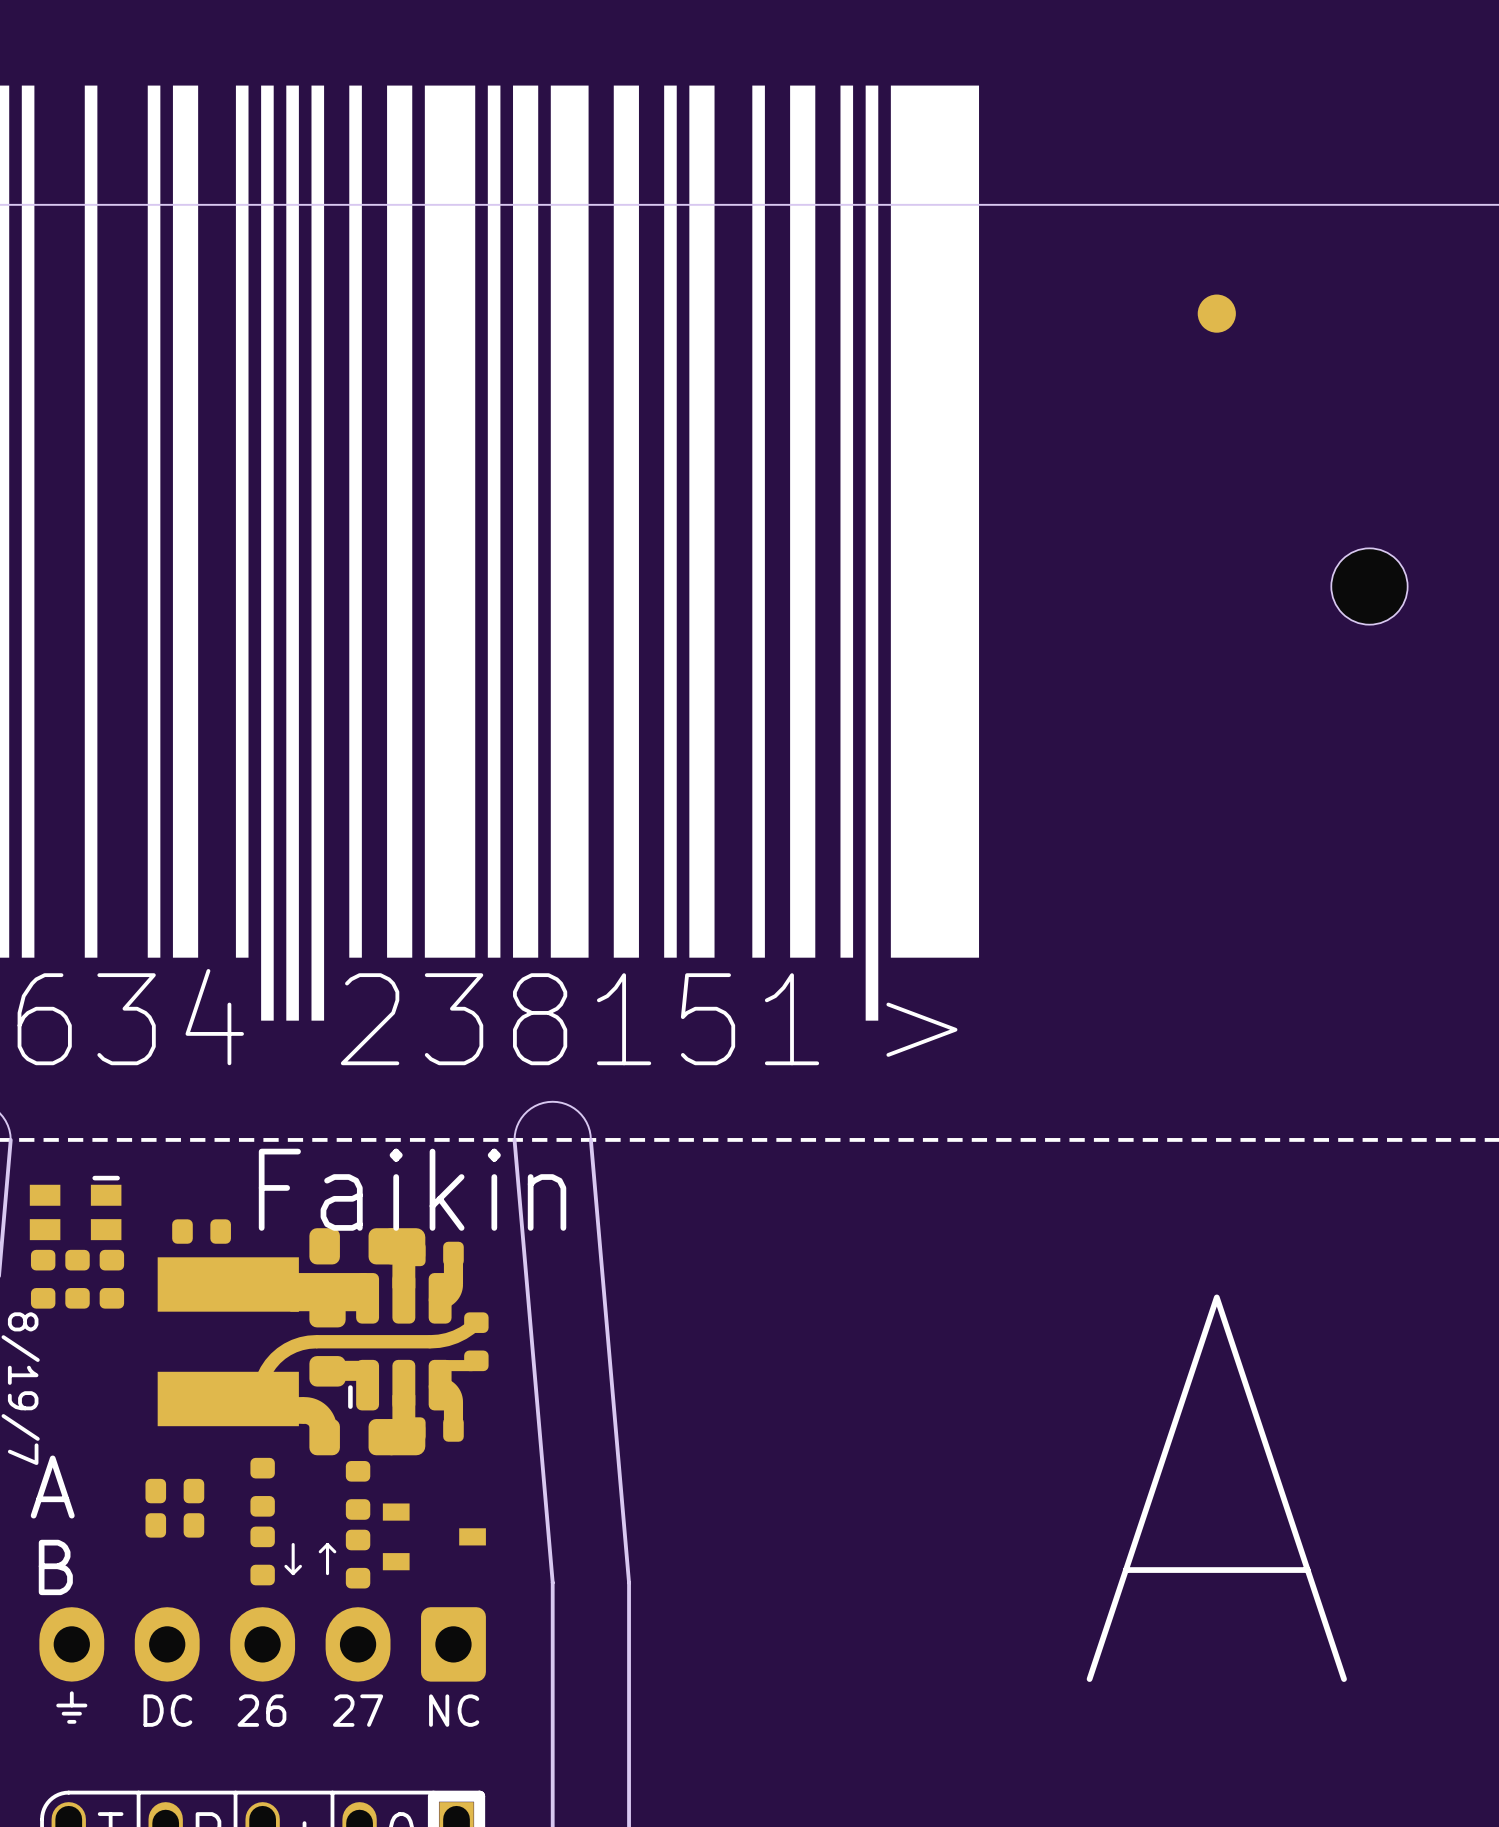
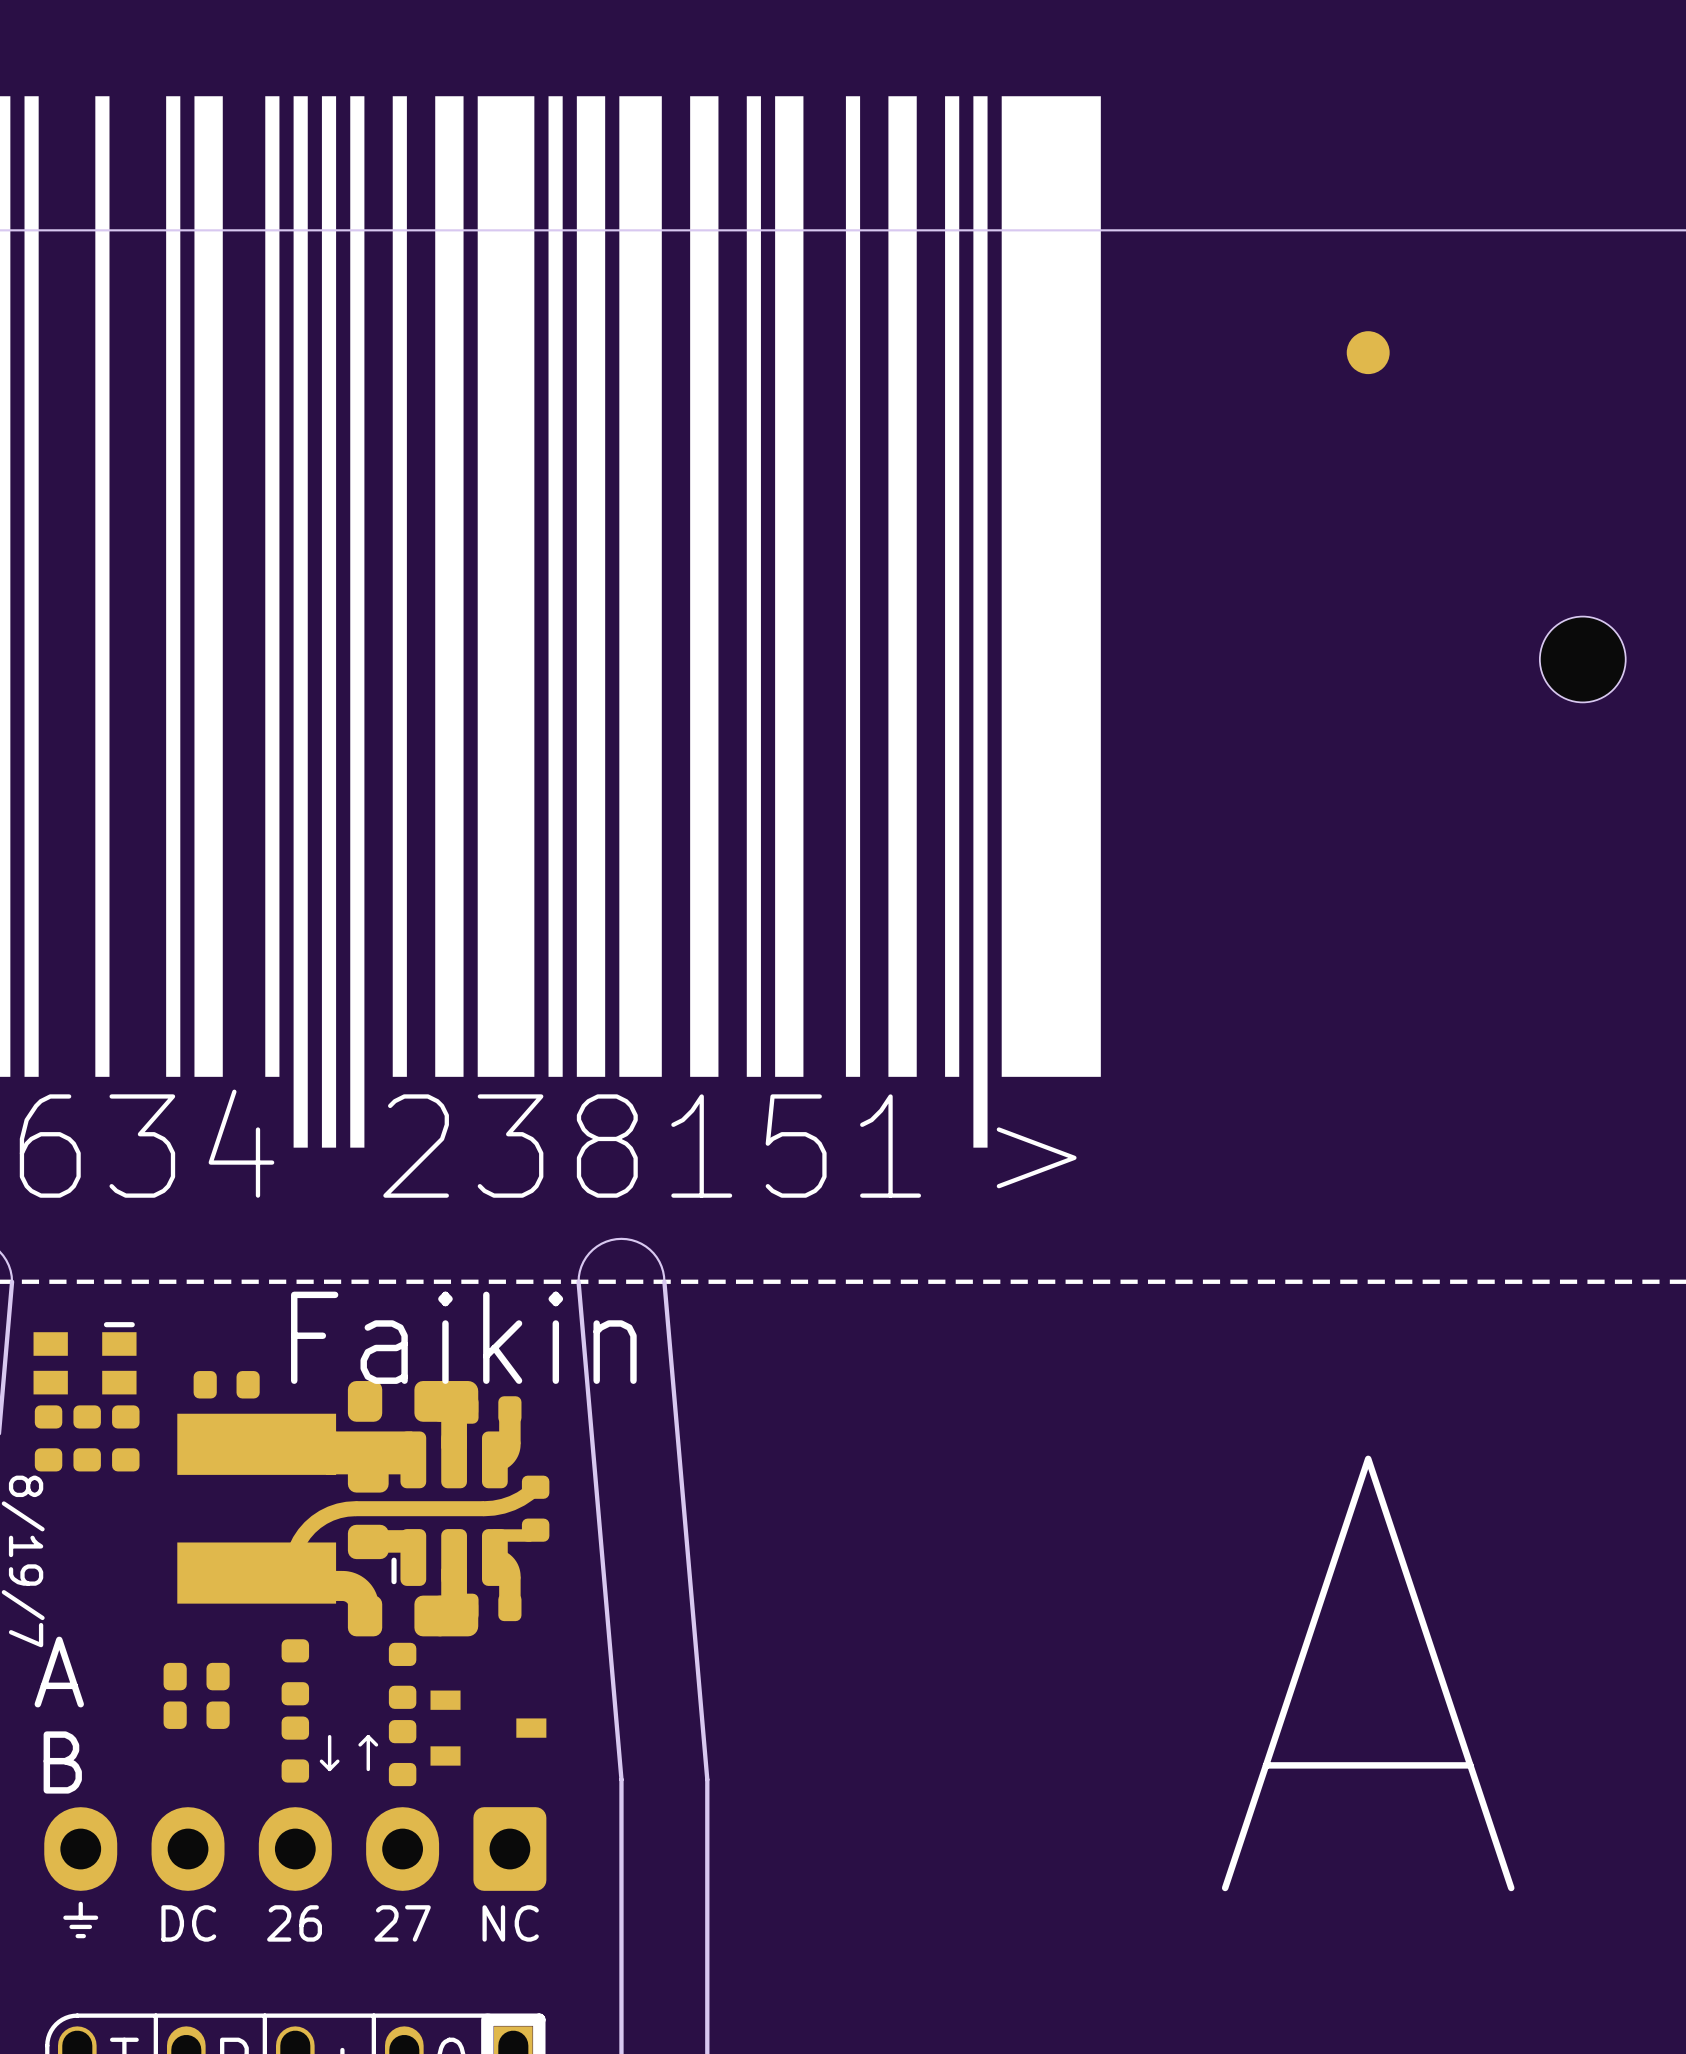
part position: (1369, 586) -> (1582, 659)

